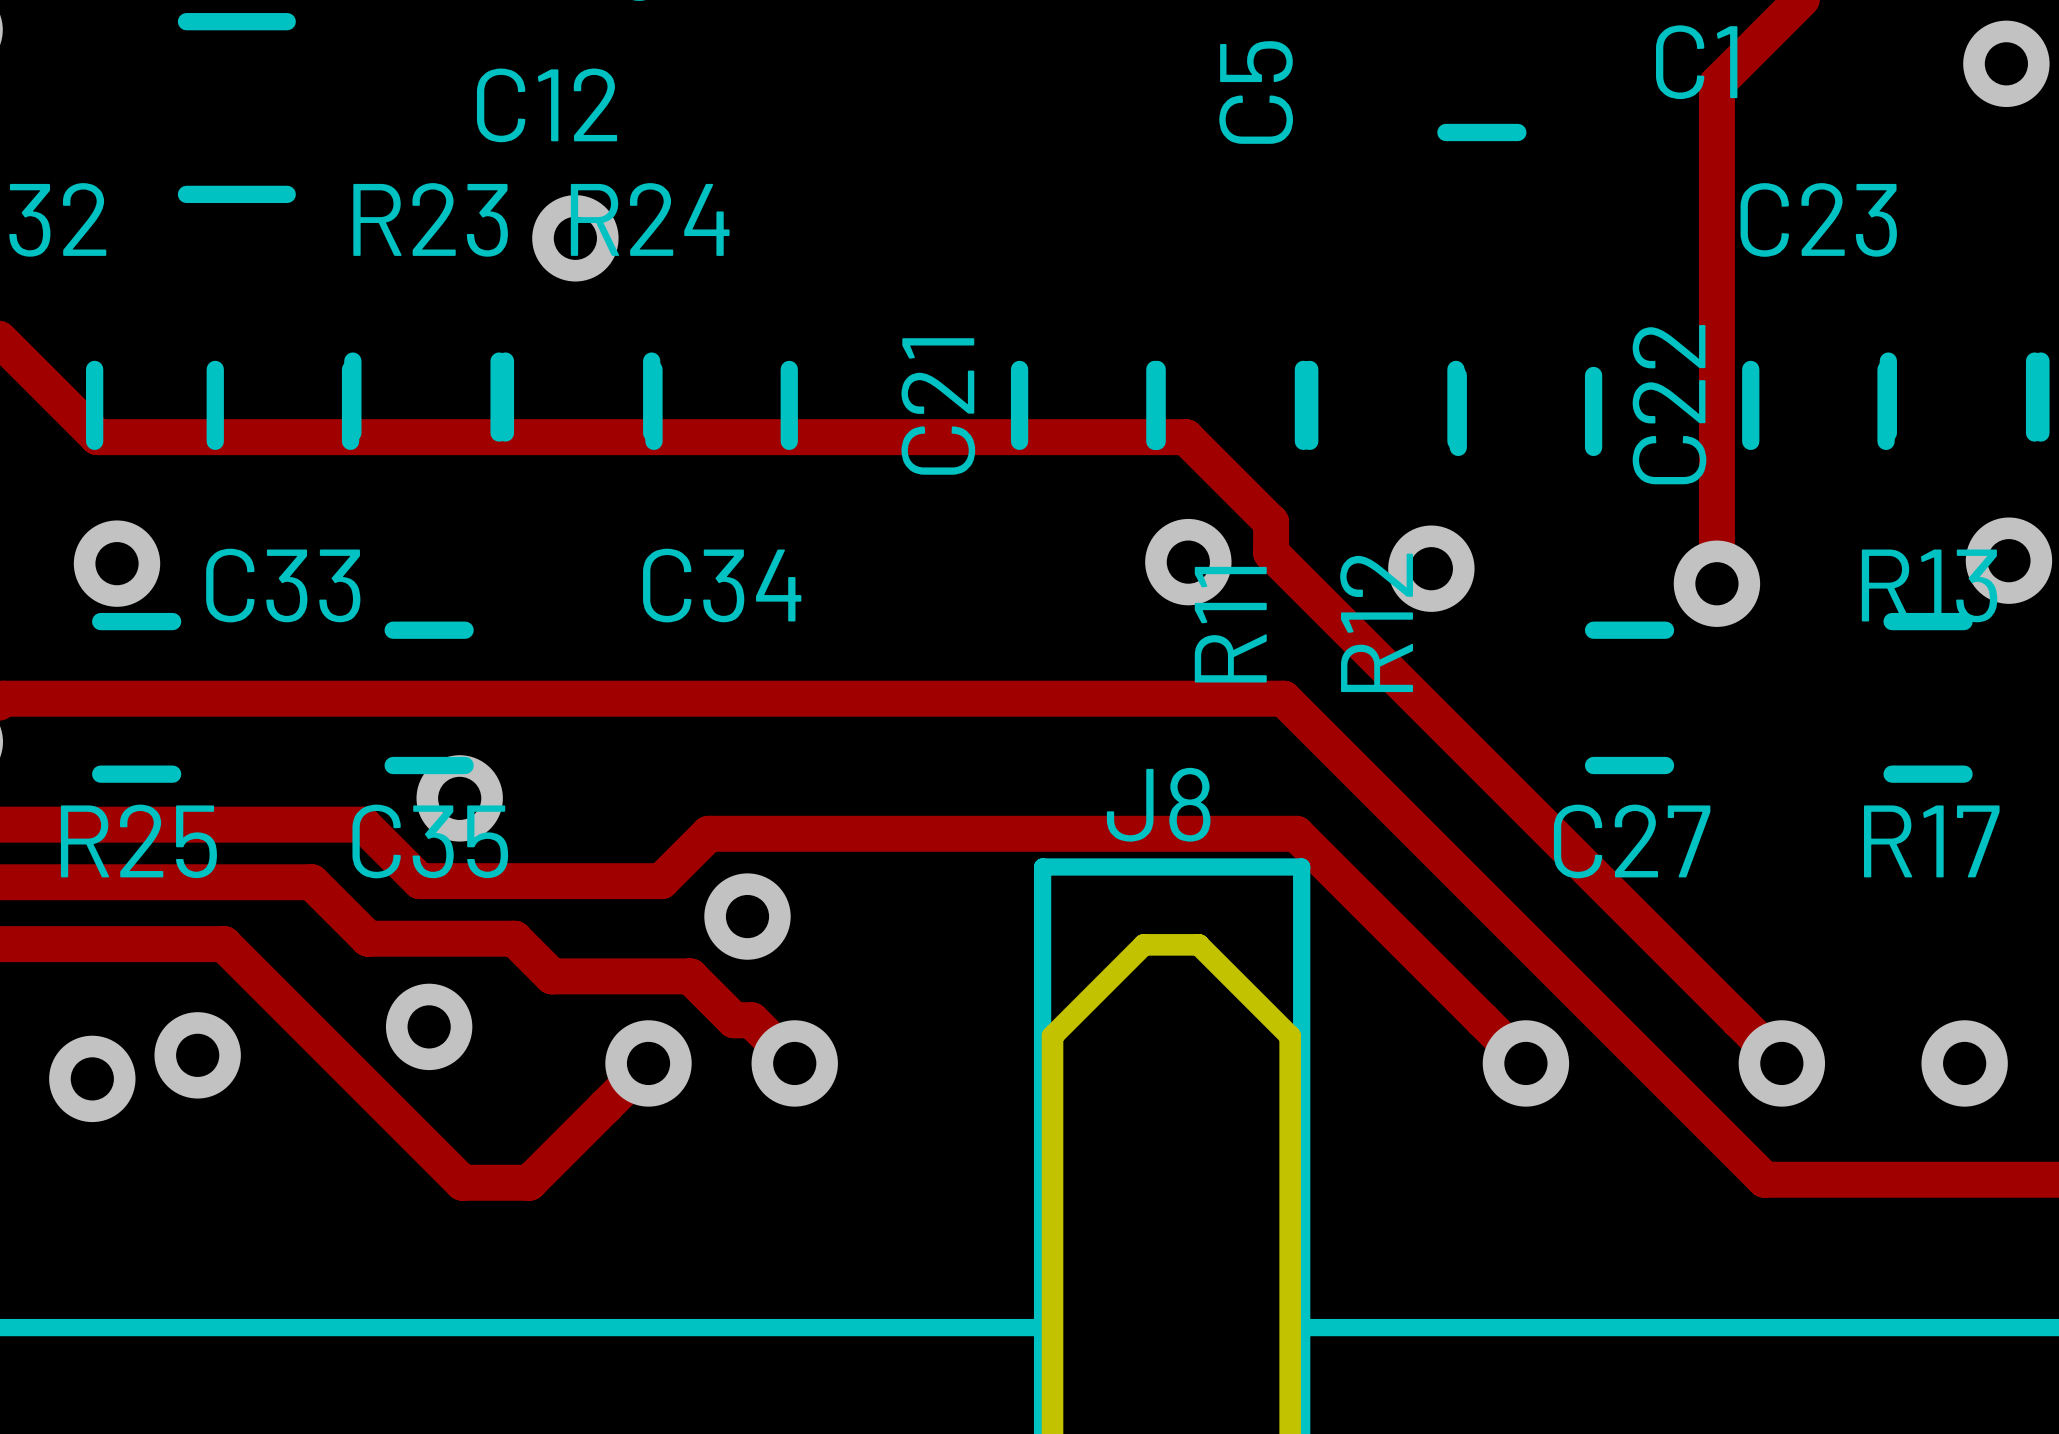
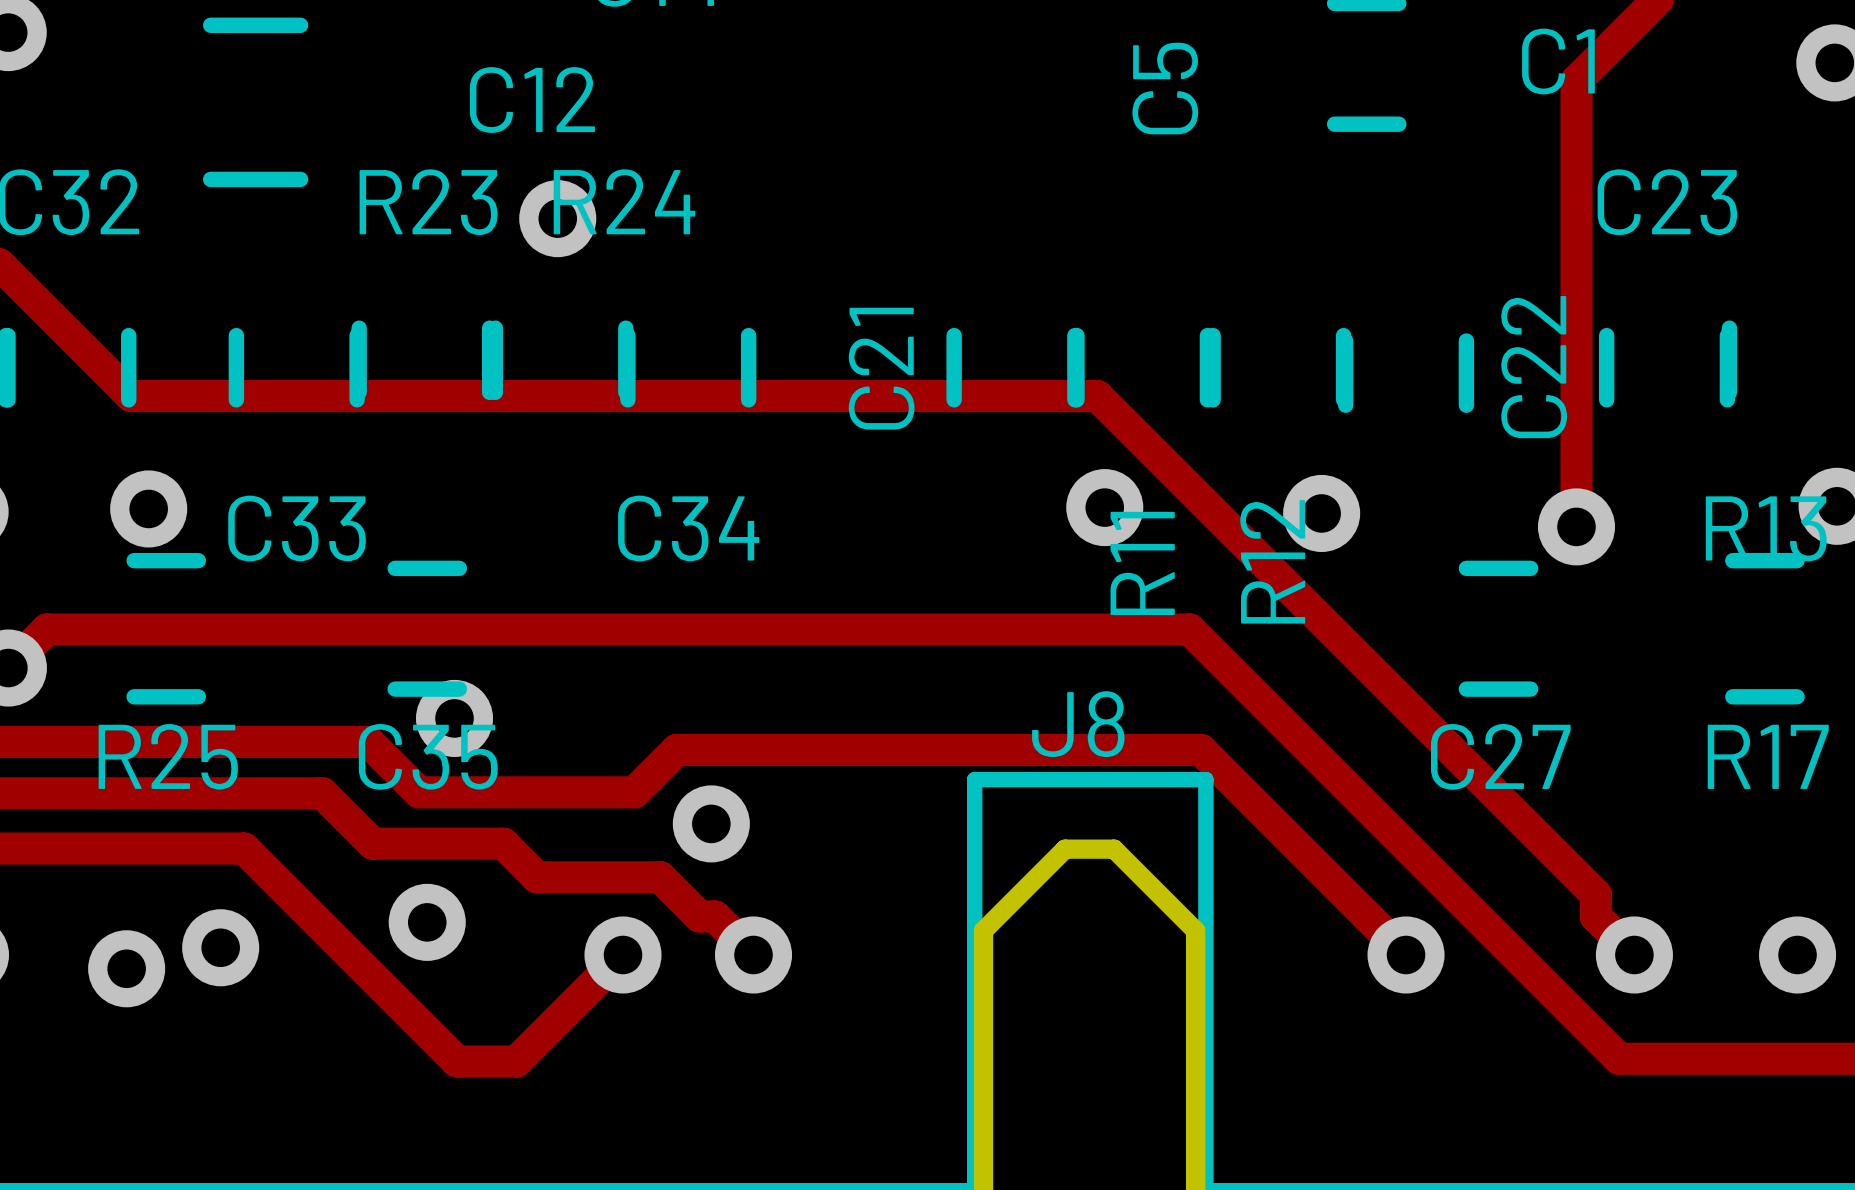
track: (1180, 437) (1185, 437) (1271, 522) (1271, 552) (1738, 1020) -> (1097, 396) (1595, 894) (1595, 916)

